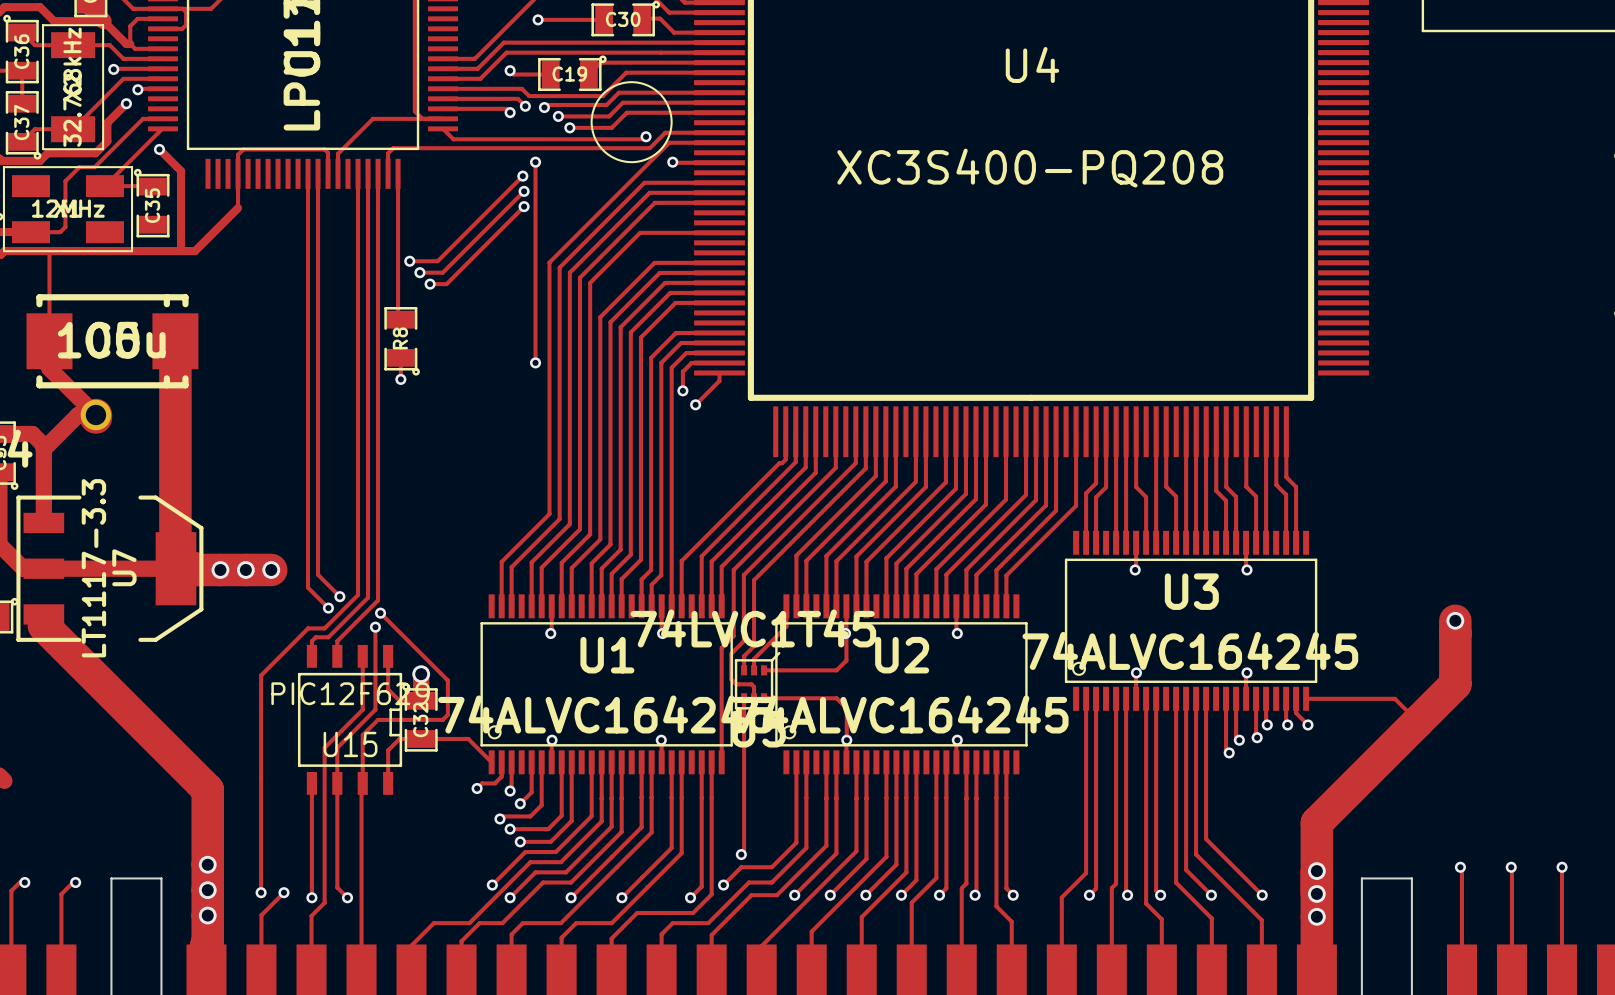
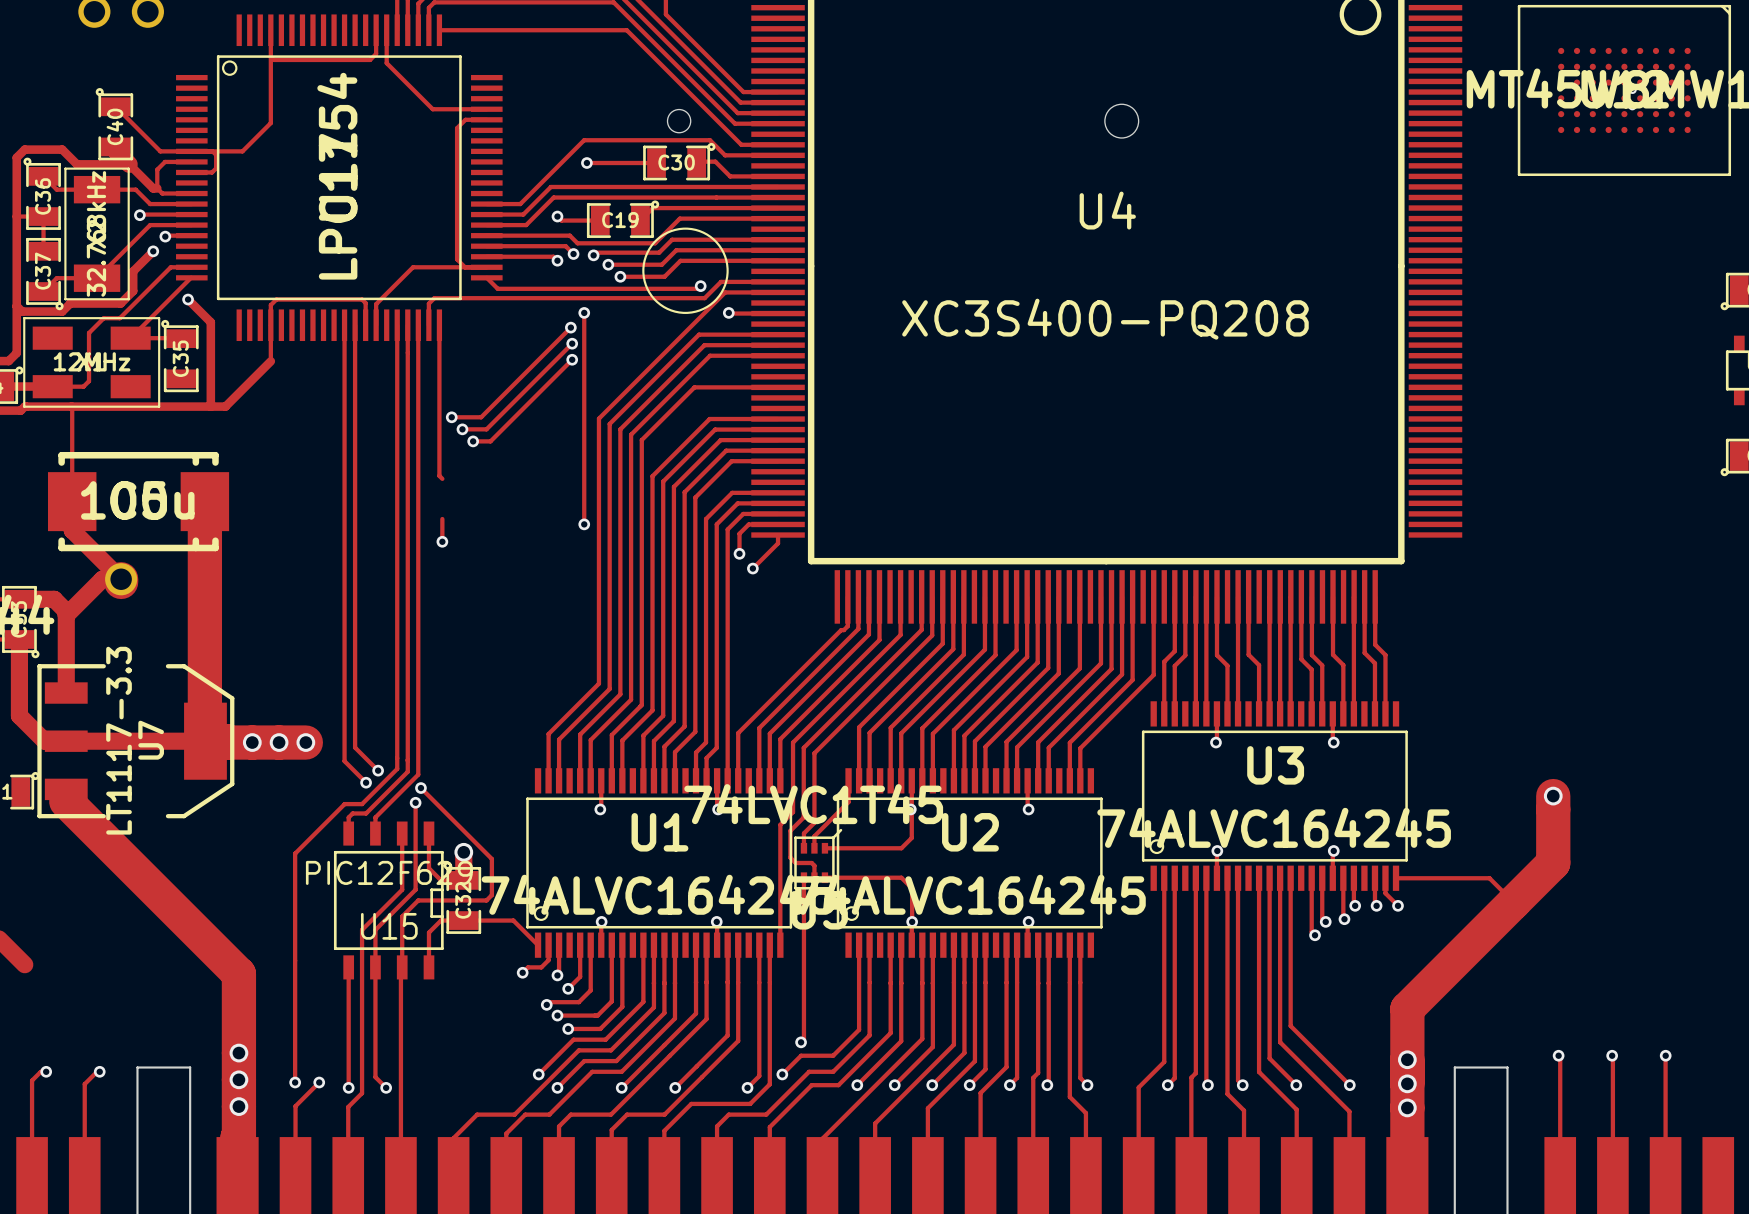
R8: (402, 341) -> none

